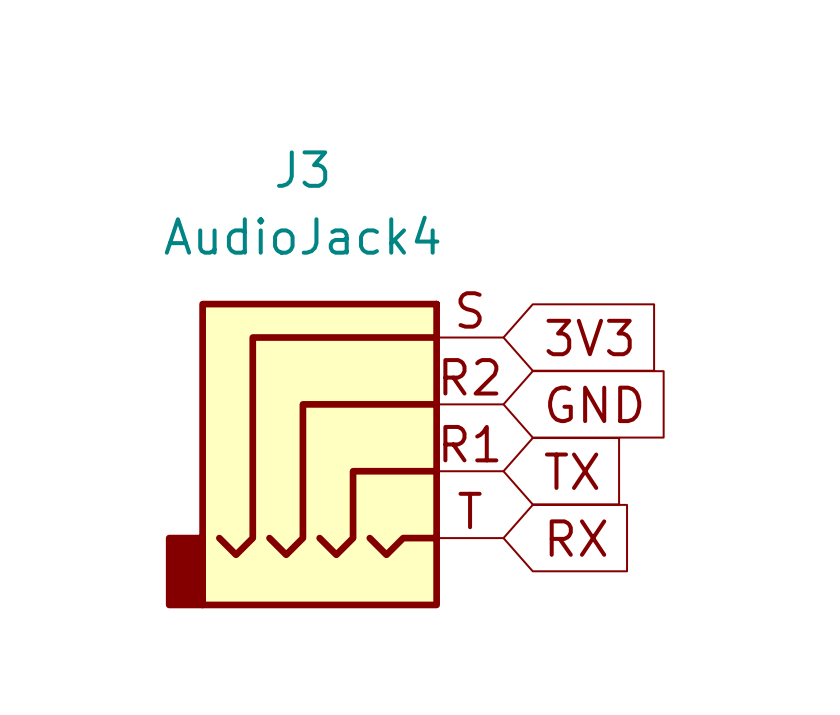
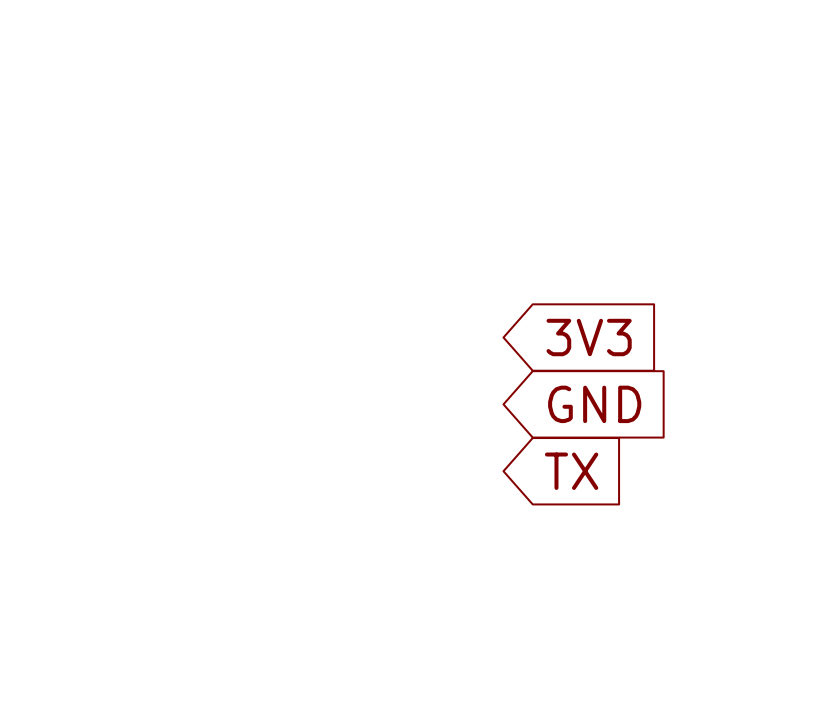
J3: AudioJack4 (334, 454) -> none
global label: RX (577, 538) -> none

